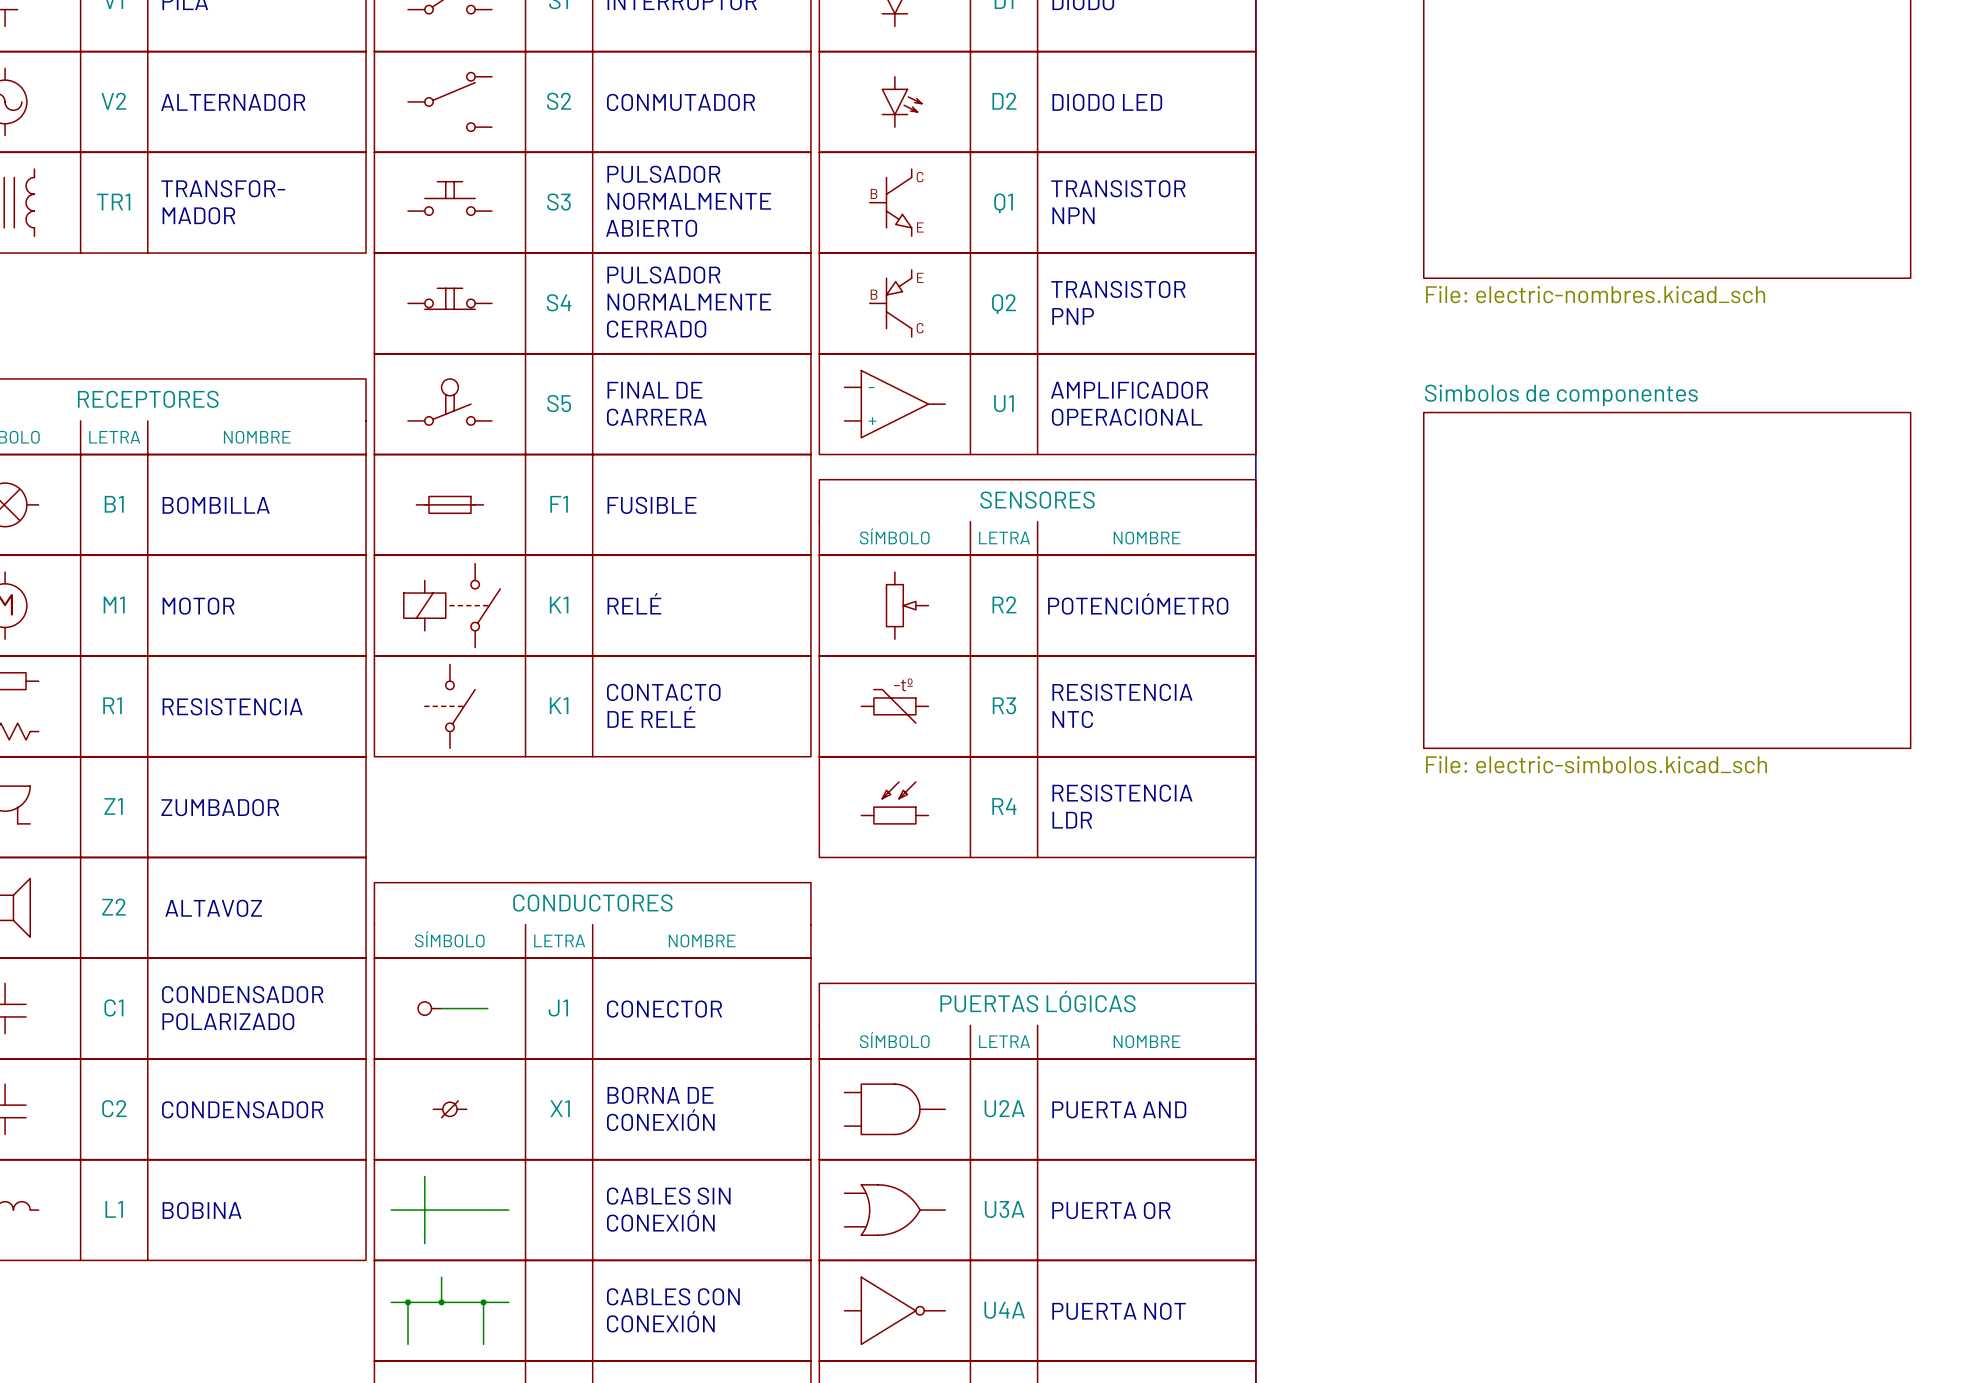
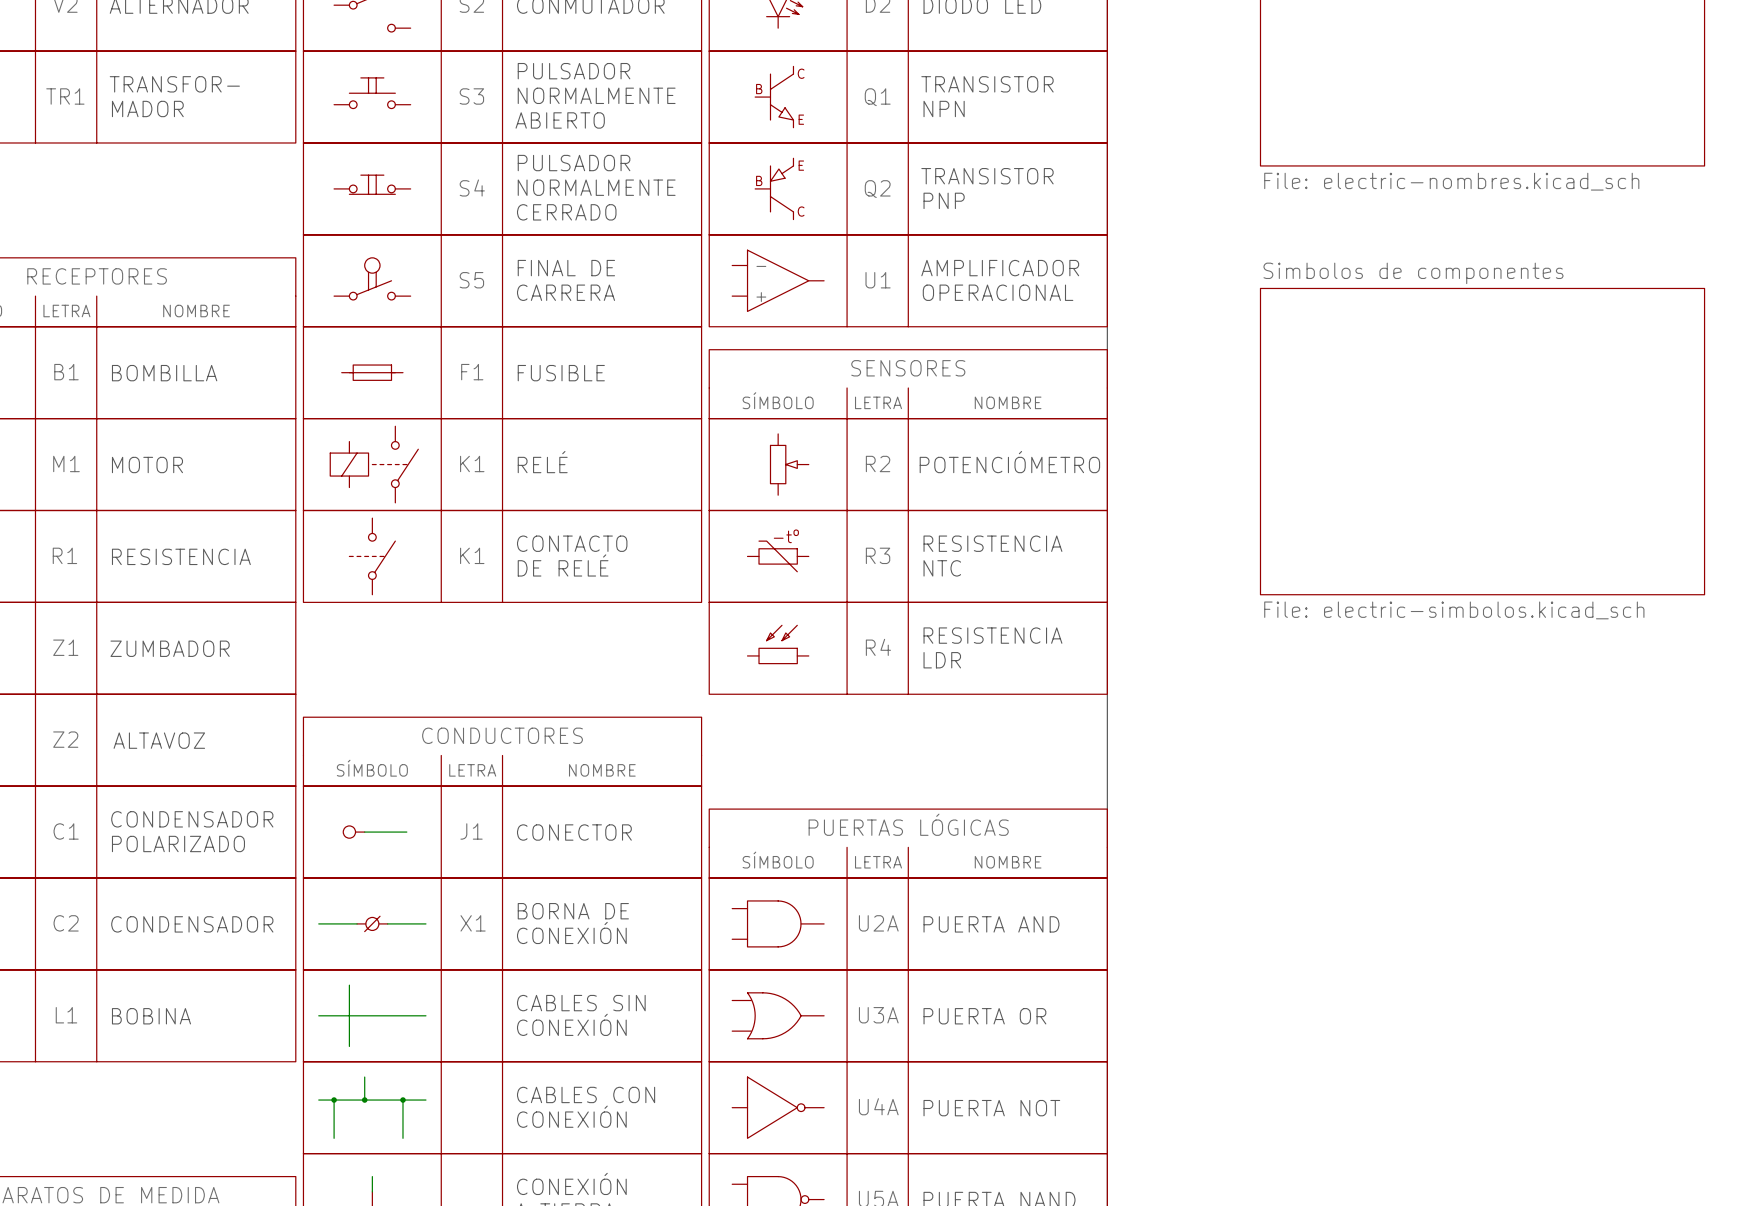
wire: none -> (318, 923) (357, 923)
wire: none -> (387, 923) (425, 923)

